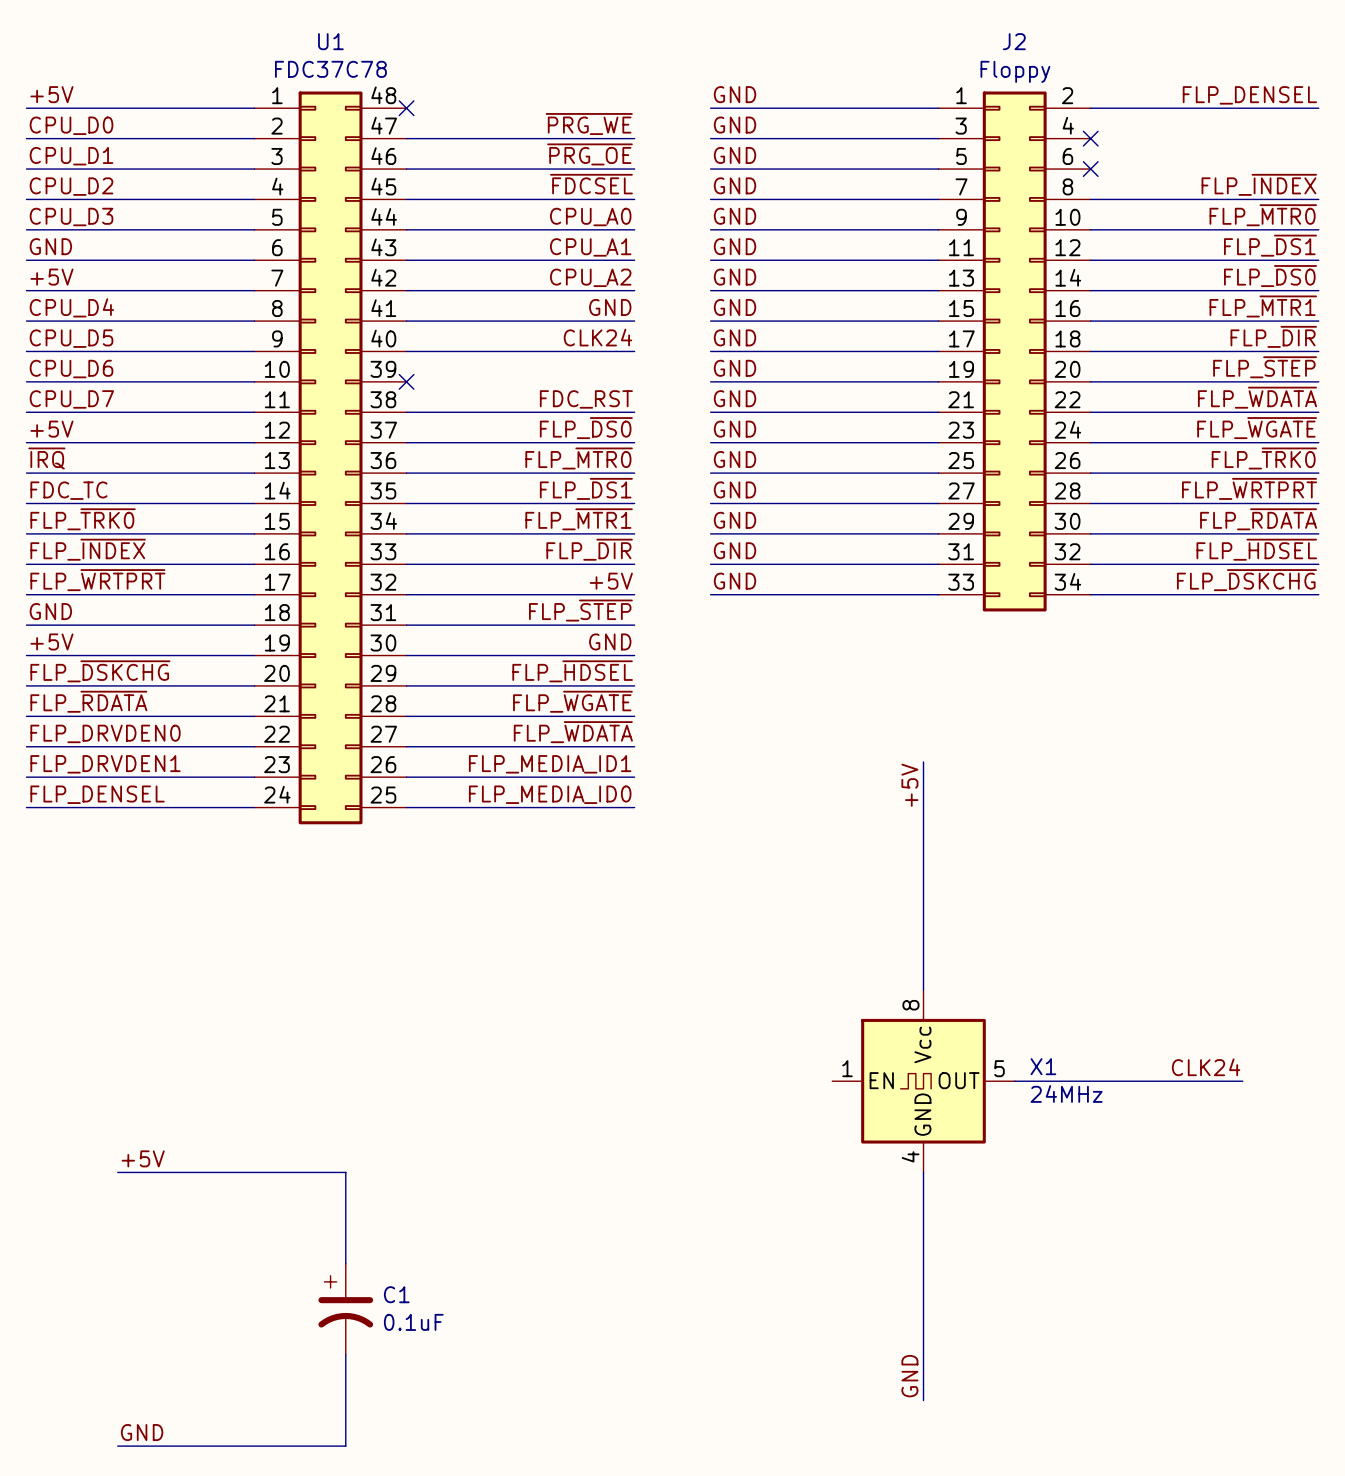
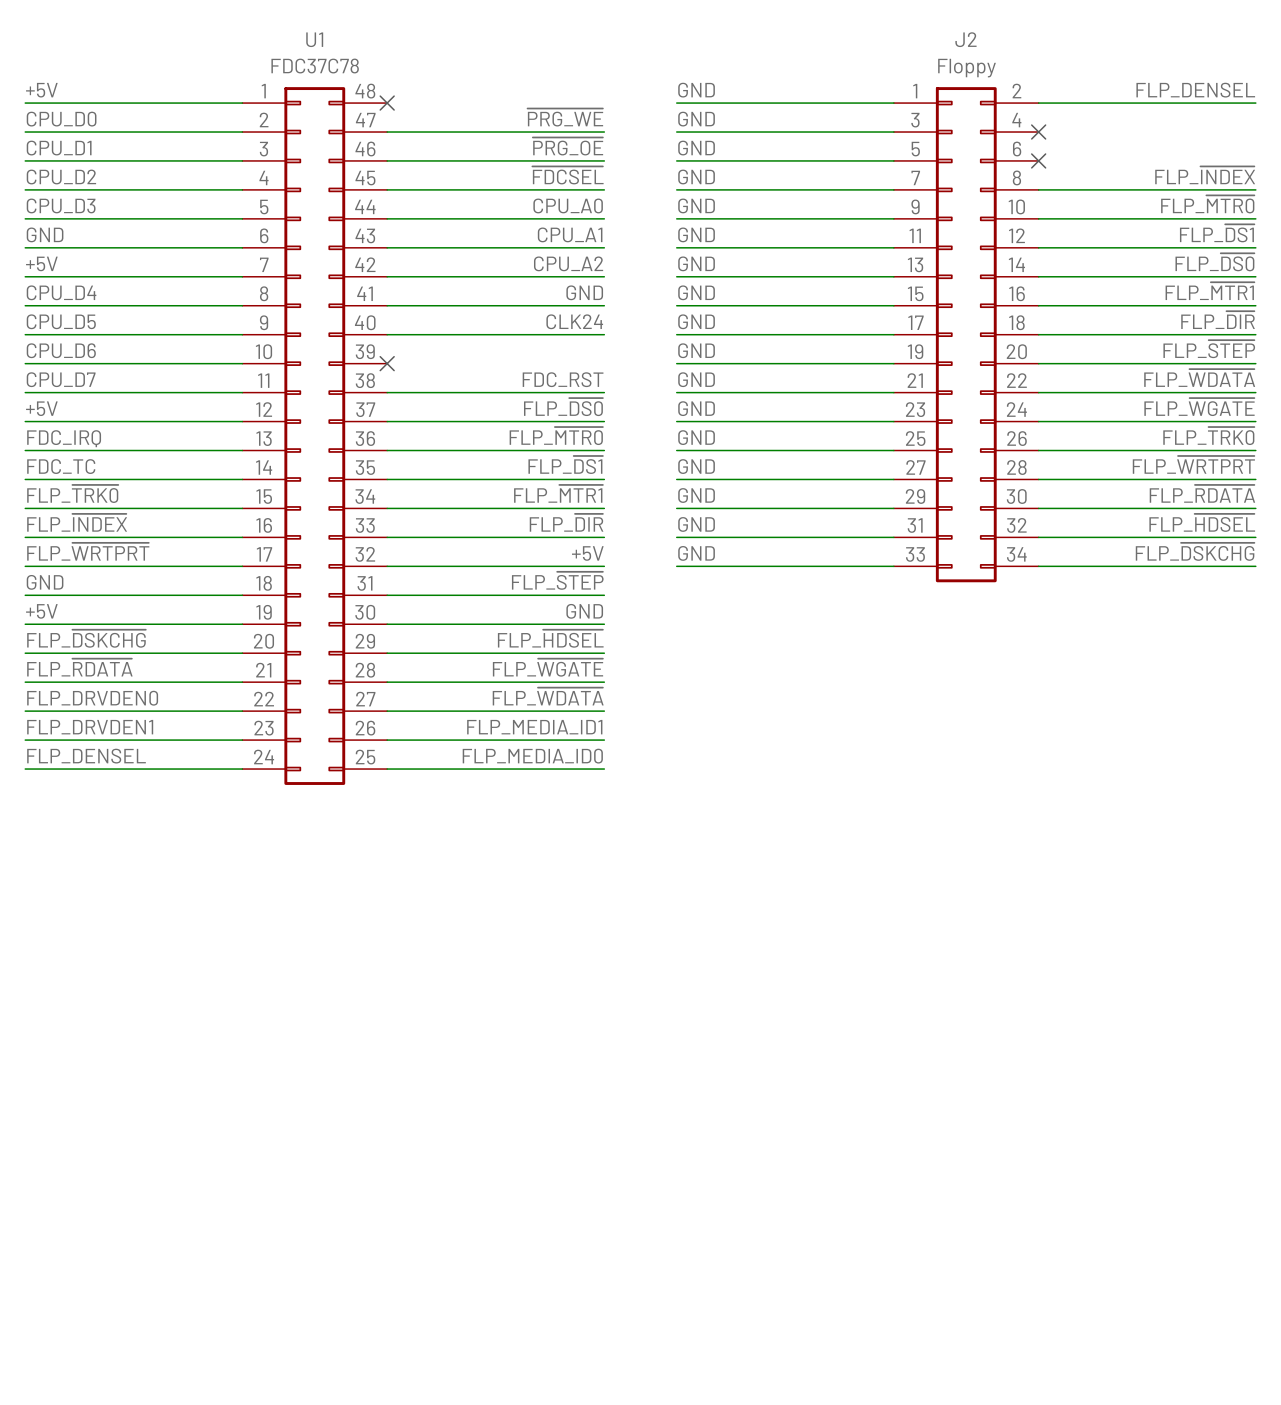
label: ~{IRQ} (46, 458) -> FDC_IRQ (64, 438)
wire: (923, 761) (923, 990) -> none
label: +5V (909, 785) -> none
label: CLK24 (1206, 1067) -> none
X1: 24MHz (923, 1081) -> none
wire: (1014, 1081) (1242, 1081) -> none
label: +5V (143, 1158) -> none
wire: (117, 1172) (345, 1172) (345, 1263) -> none
wire: (923, 1172) (923, 1400) -> none
C1: 0.1uF (345, 1309) -> none
wire: (345, 1354) (345, 1446) (117, 1446) -> none
label: GND (909, 1376) -> none
label: GND (142, 1432) -> none

